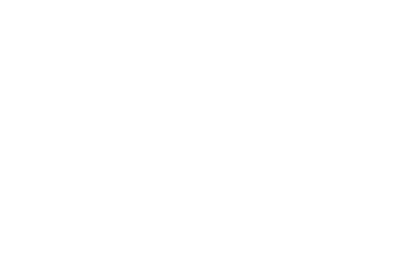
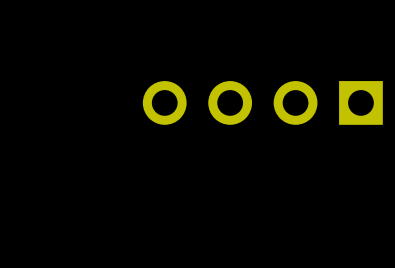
part: none -> (262, 102)

